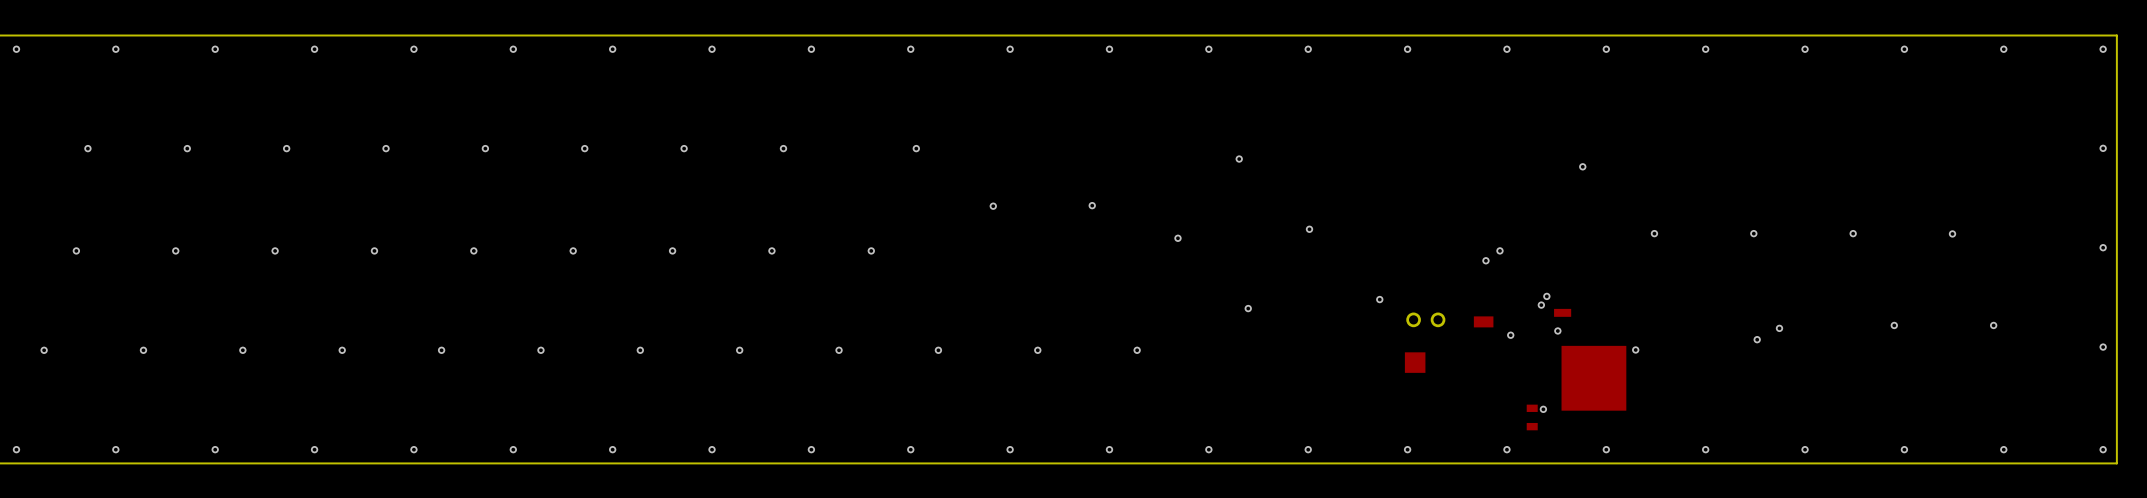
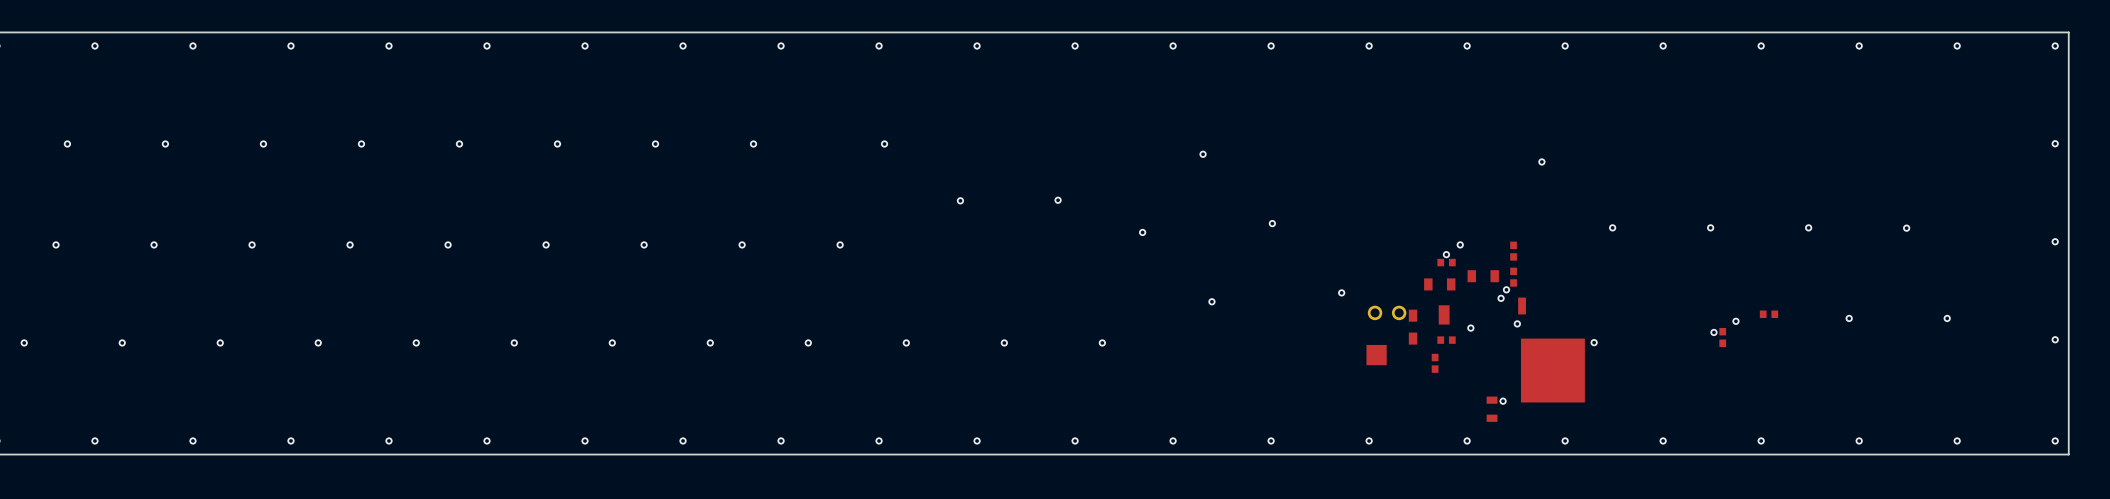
part: none -> (1513, 251)
part: none -> (1446, 262)
part: none -> (1483, 276)
part: none -> (1513, 277)
part: none -> (1439, 284)
part rotation: 0° (1562, 312) -> 90° clockwise (1522, 306)
part rotation: 0° (1483, 321) -> 90° clockwise (1444, 314)
part: none -> (1769, 314)
part: none -> (1413, 327)
part: none -> (1722, 337)
part: none -> (1446, 340)
part: none -> (1435, 363)

